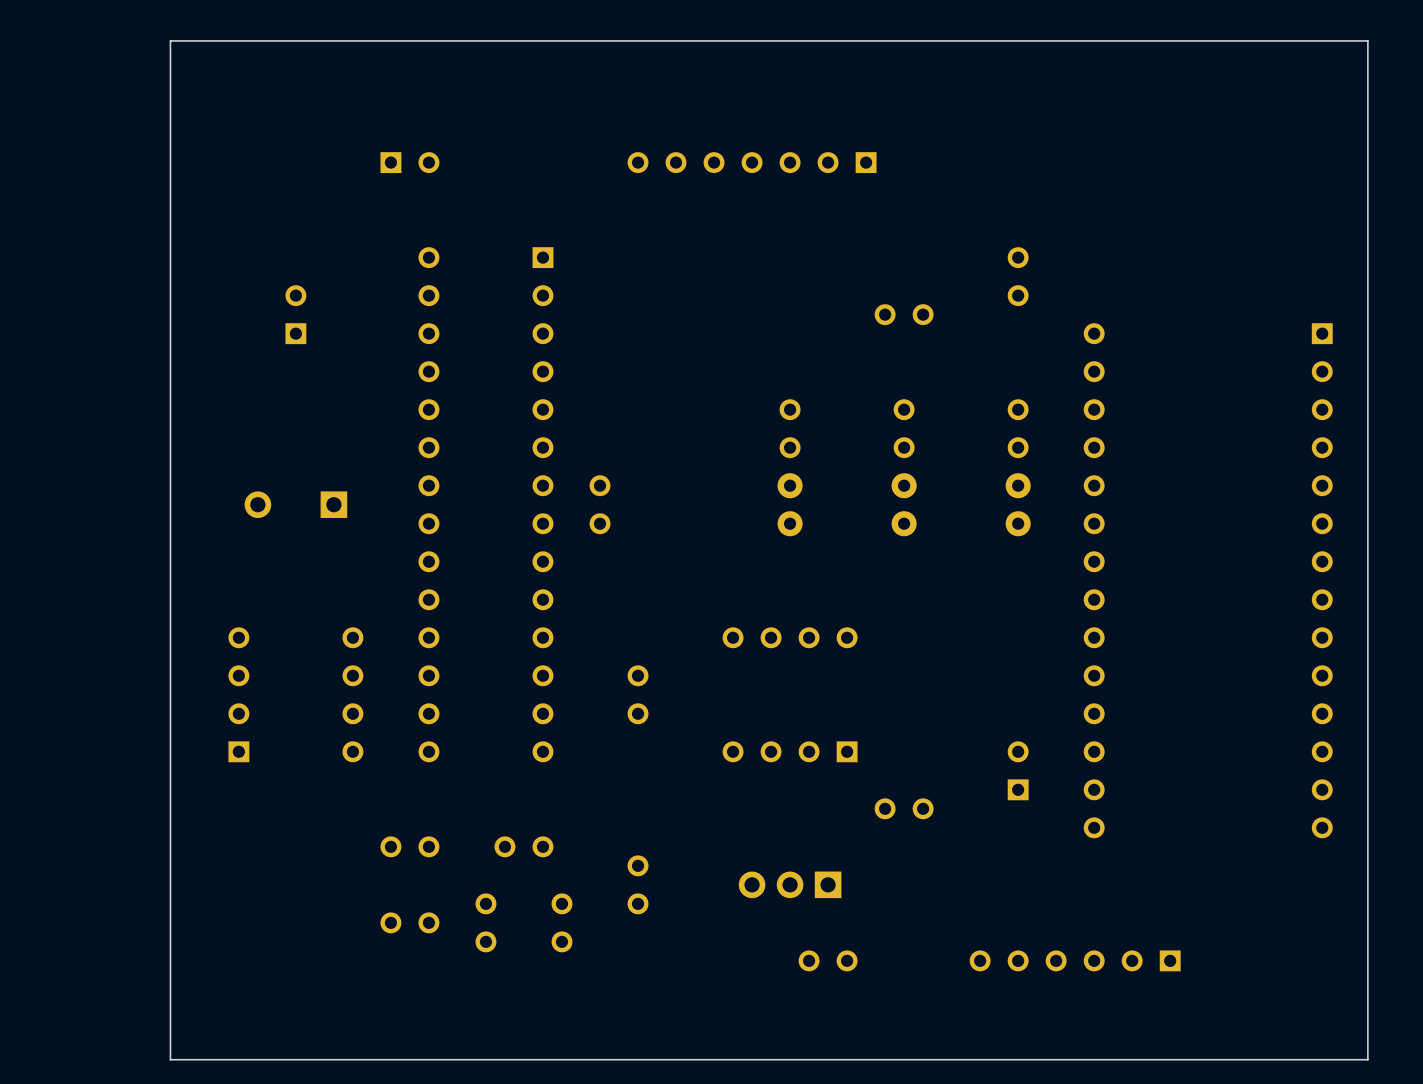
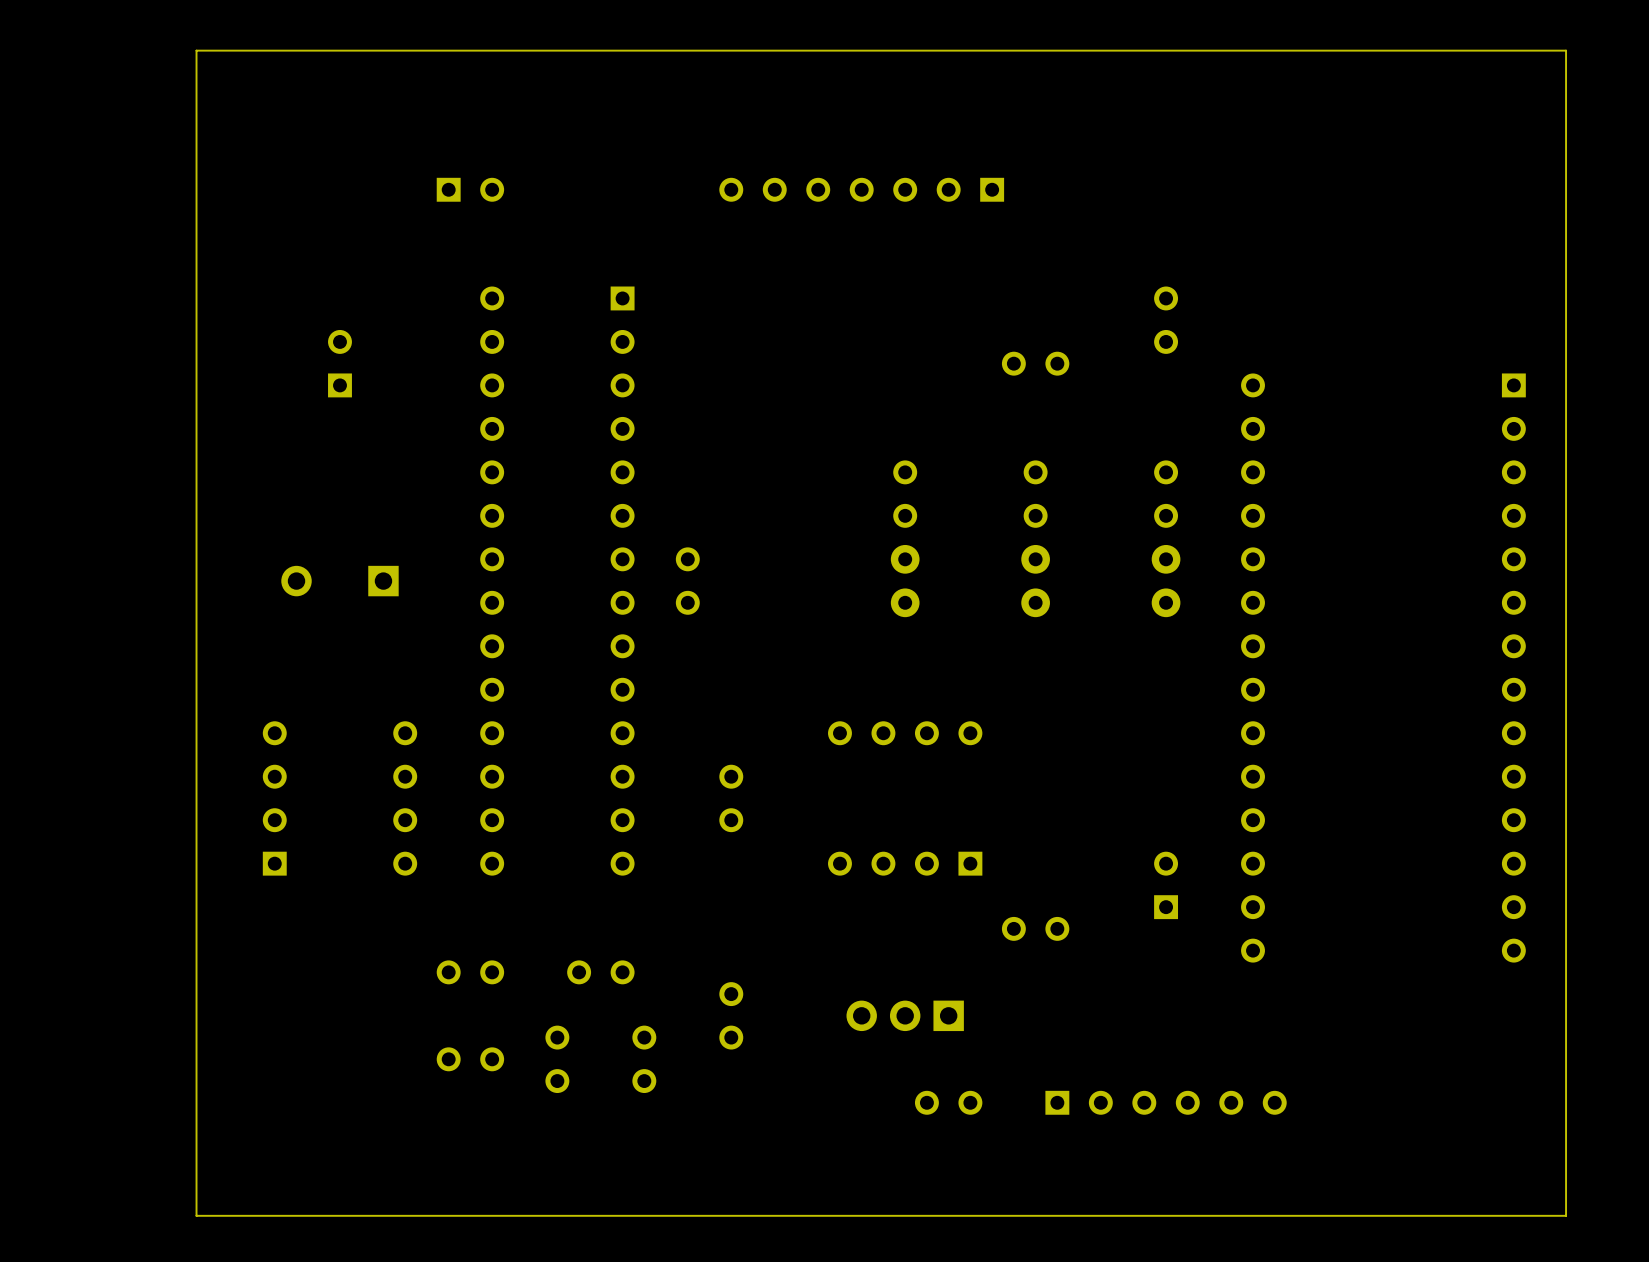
part rotation: 0° (1075, 960) -> 180° (1166, 1102)

